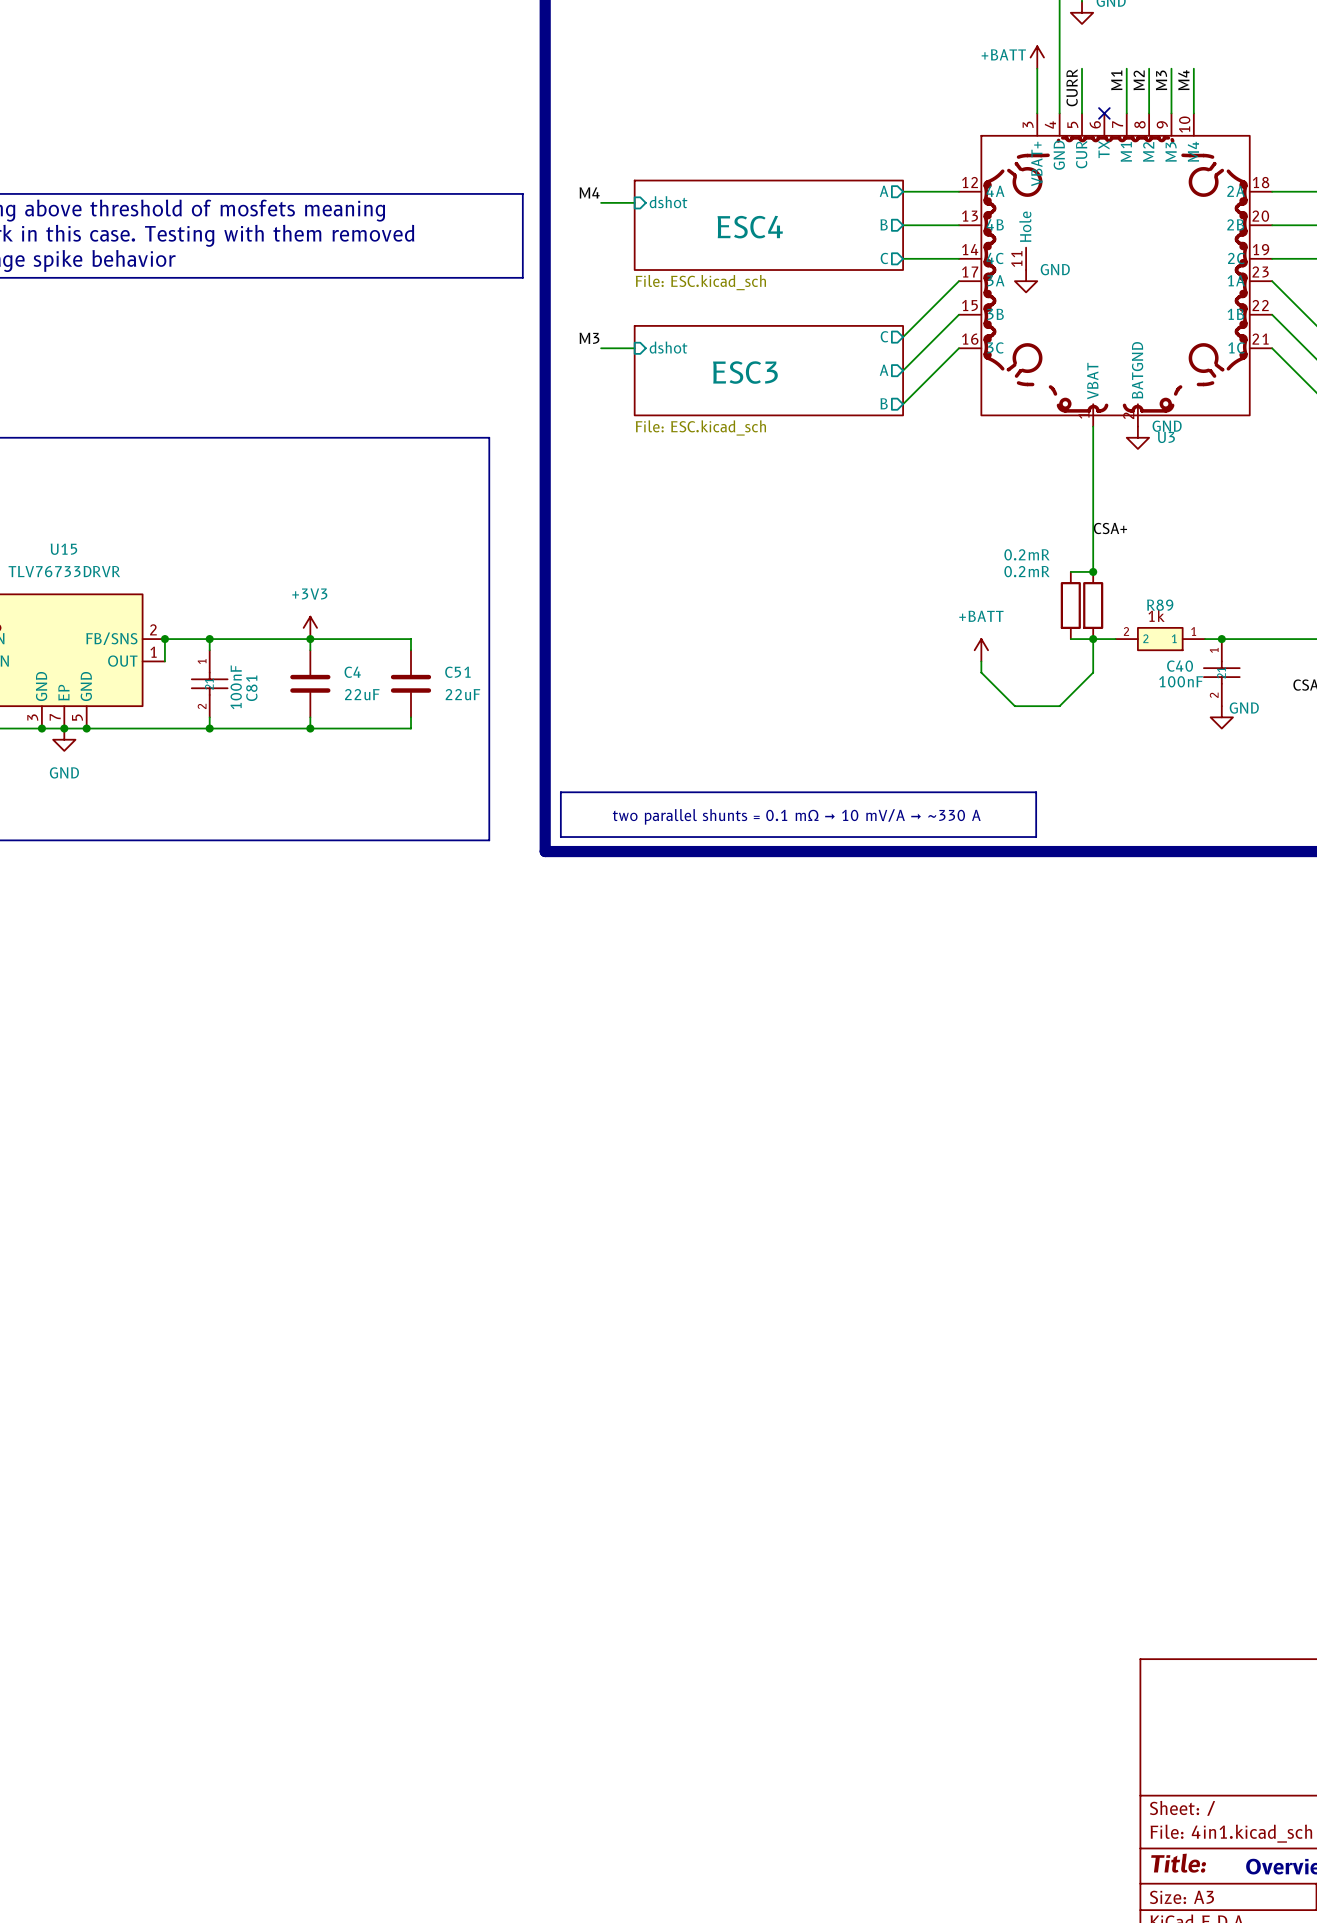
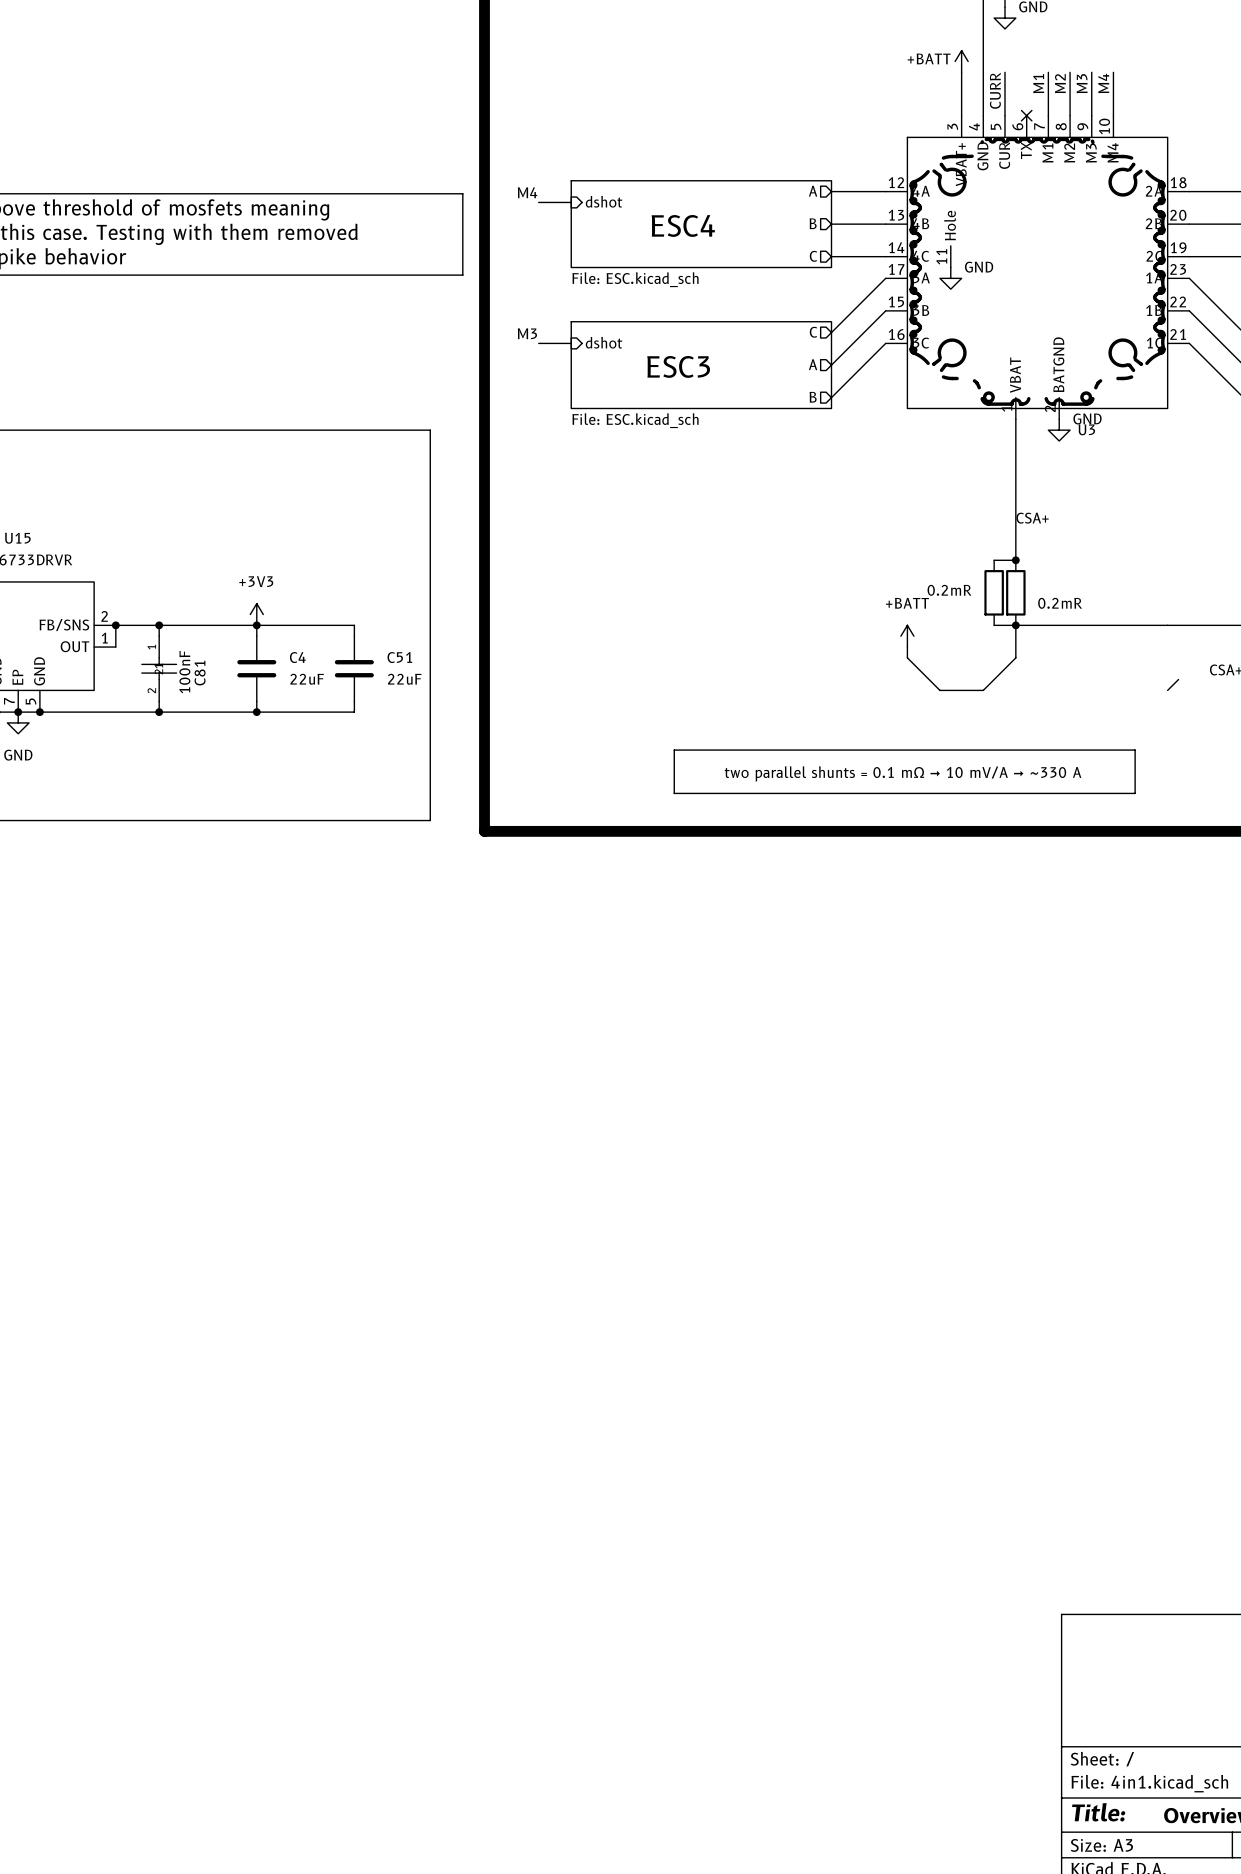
part value position: 0.2mR (1026, 554) -> 0.2mR (1060, 603)
part value position: 0.2mR (1026, 571) -> 0.2mR (949, 590)
R89: (1160, 639) -> none
junction: (1221, 639) -> none
C40: 100nF (1221, 672) -> none
wire: none -> (1178, 679) (1167, 690)
power symbol: GND (1221, 717) -> none
line: (560, 792) (1036, 792) (1036, 837) (560, 837) (560, 792) -> (674, 750) (1135, 750) (1135, 793) (674, 793) (674, 750)
text position: two parallel shunts = 0.1 mΩ → 10 mV/A → ~330 A (796, 816) -> two parallel shunts = 0.1 mΩ → 10 mV/A → ~330 A (903, 773)

